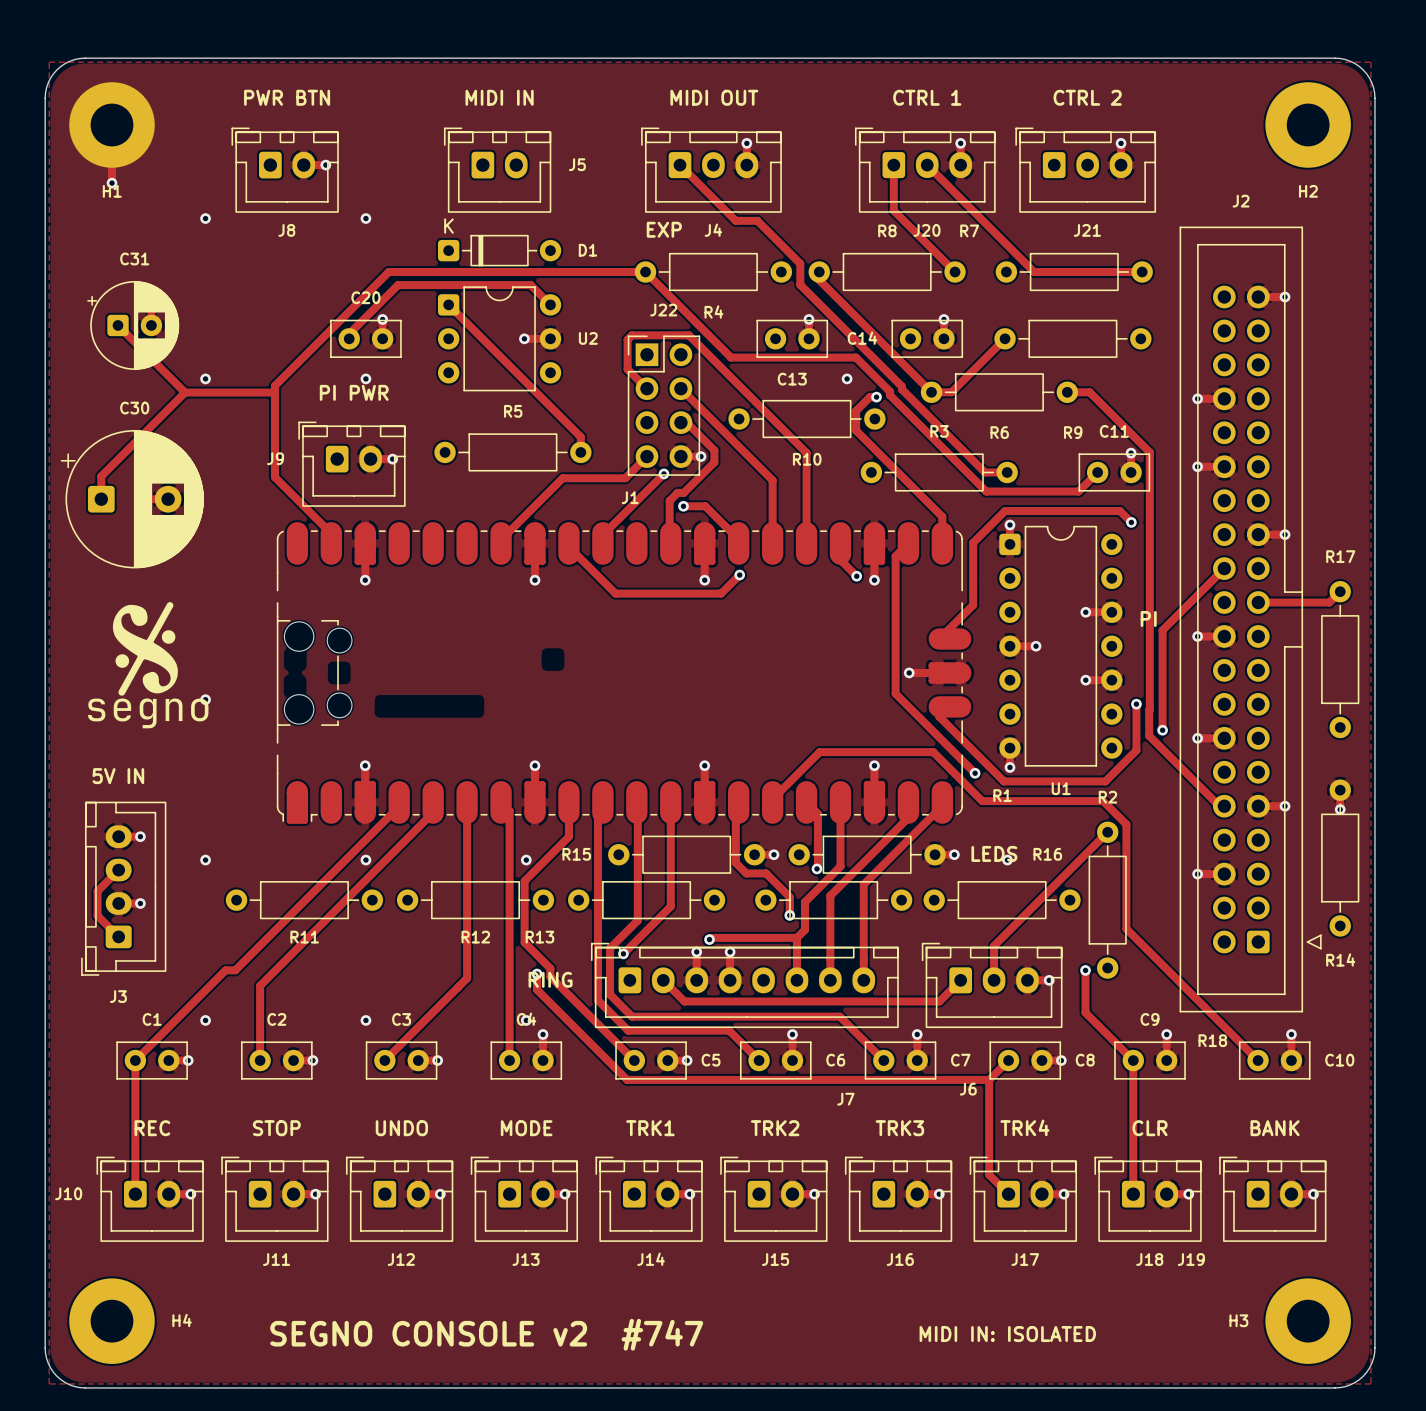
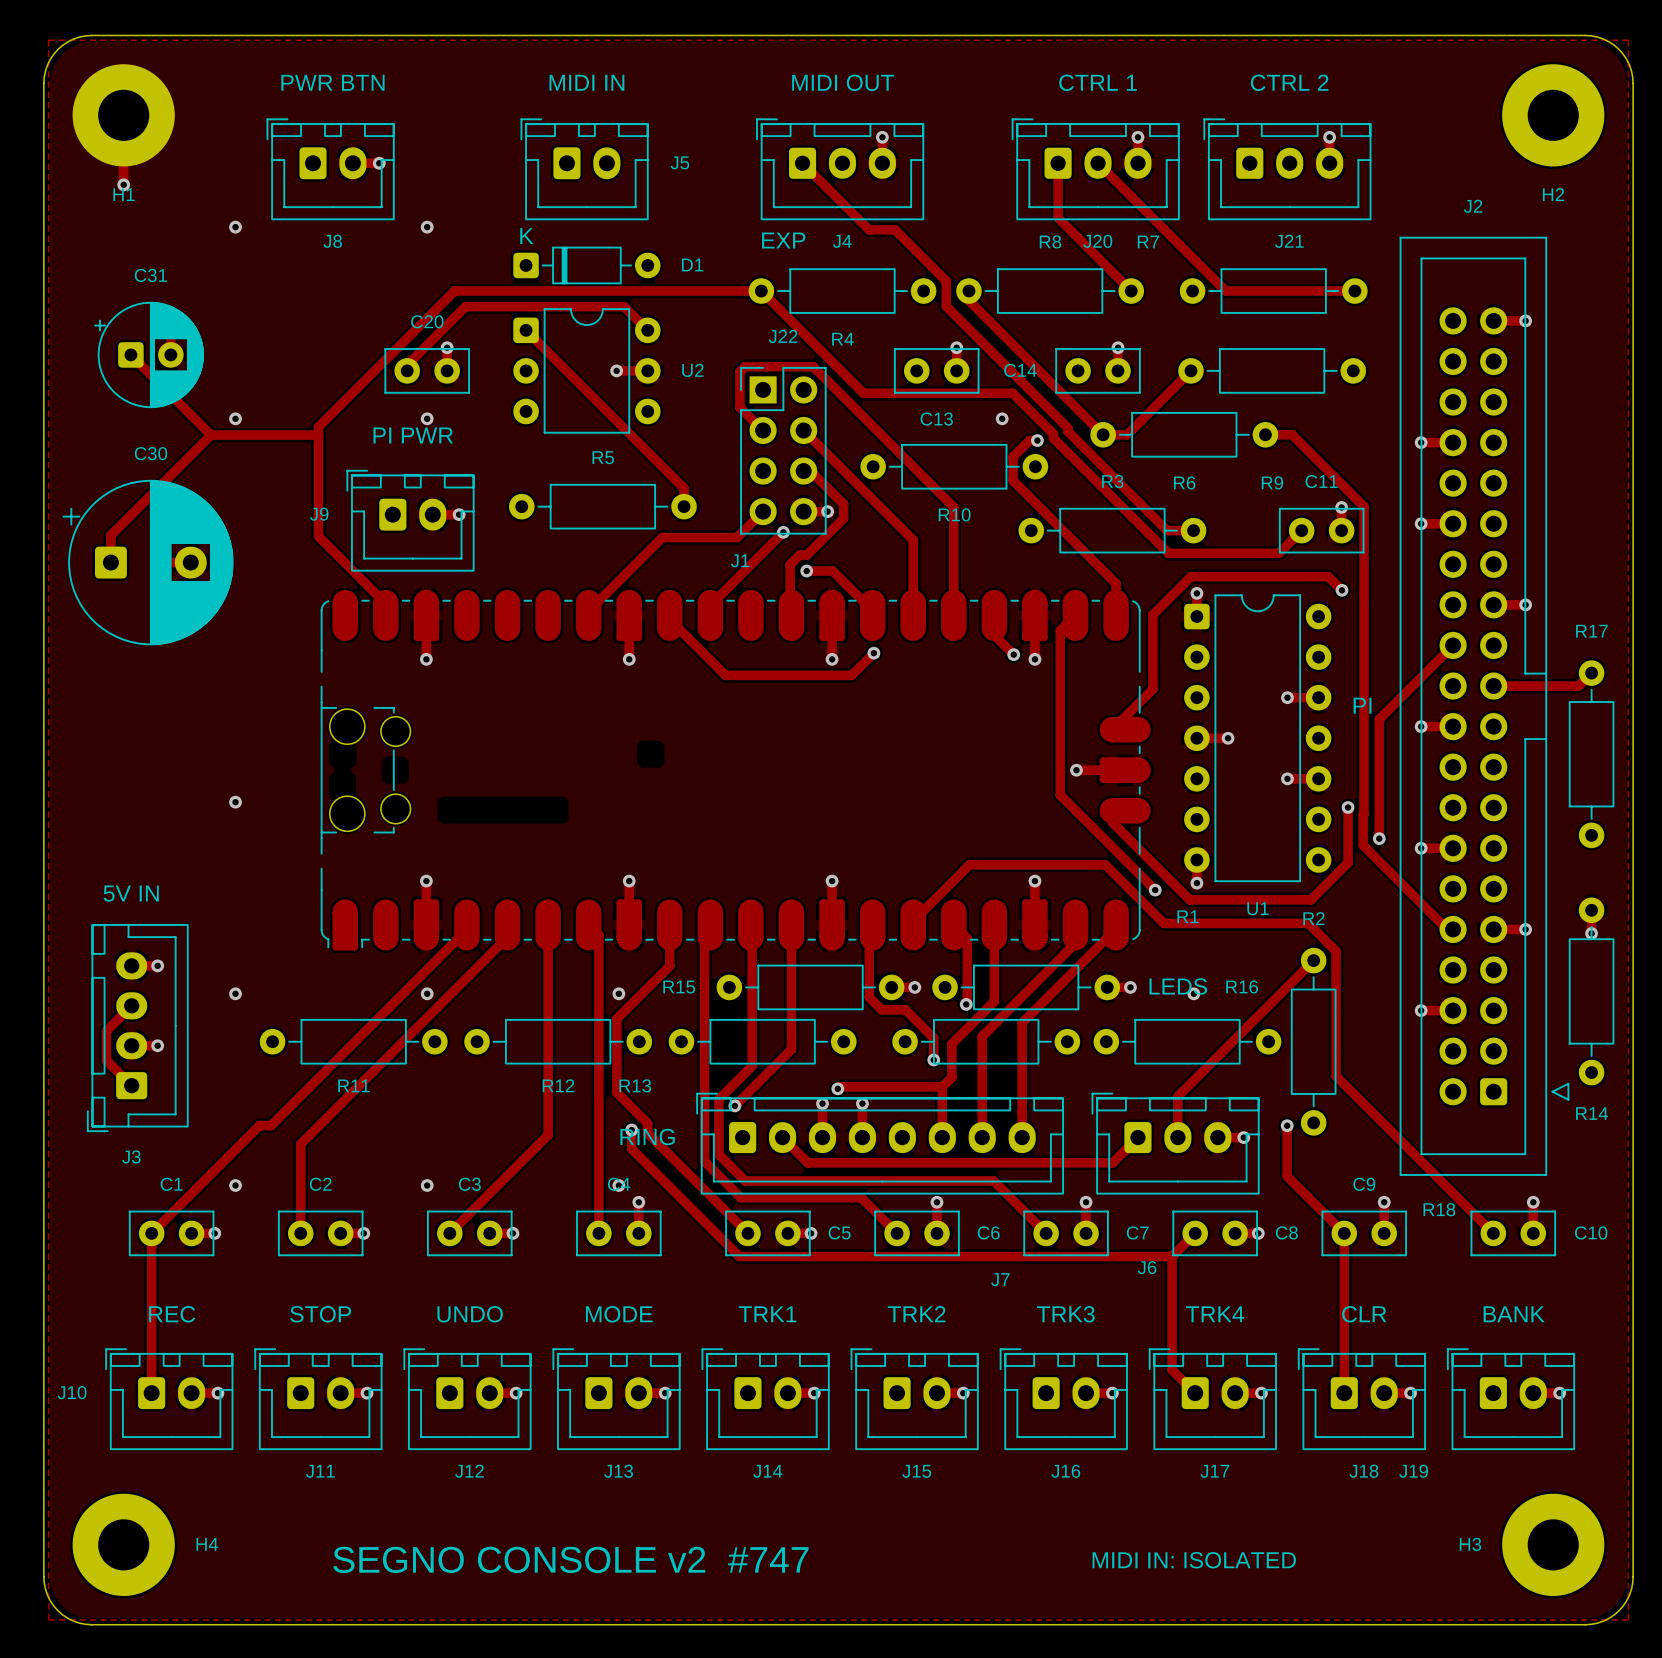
drawing: [88, 602, 209, 729] -> none

